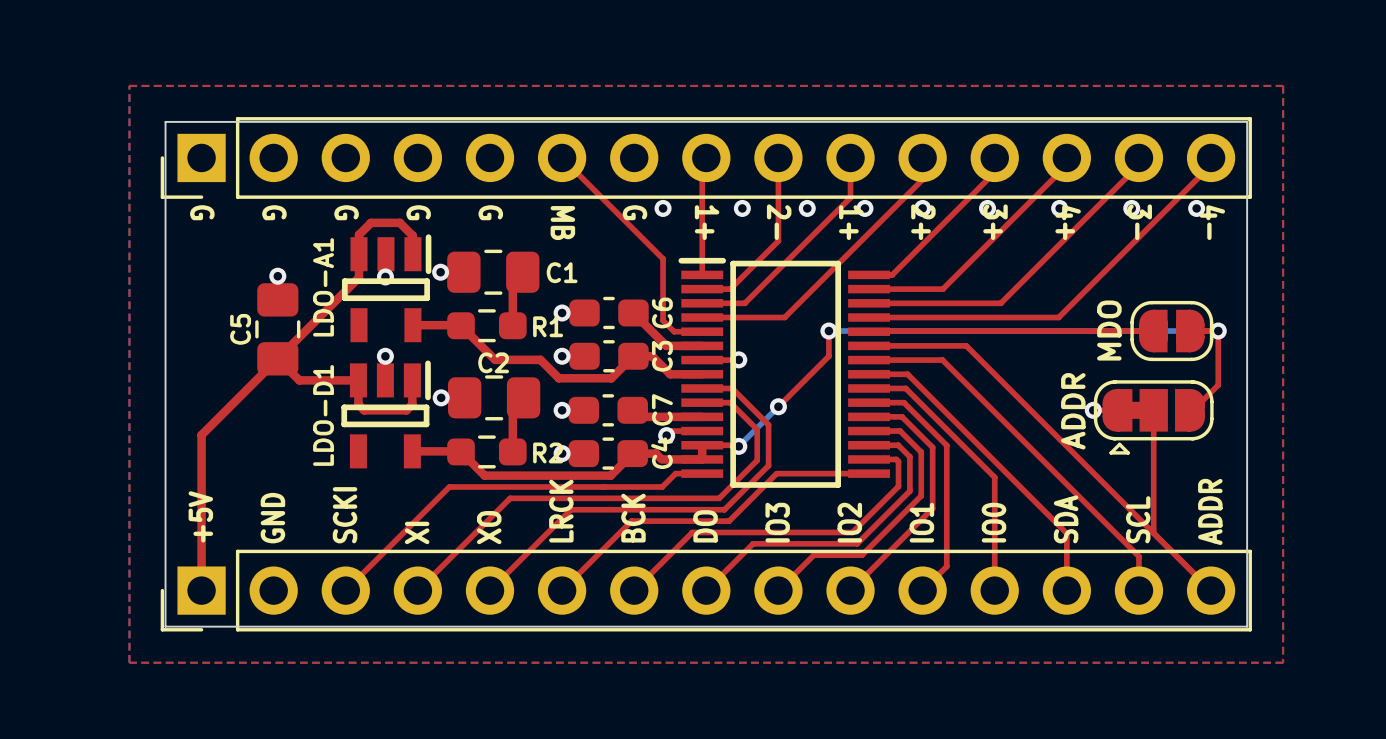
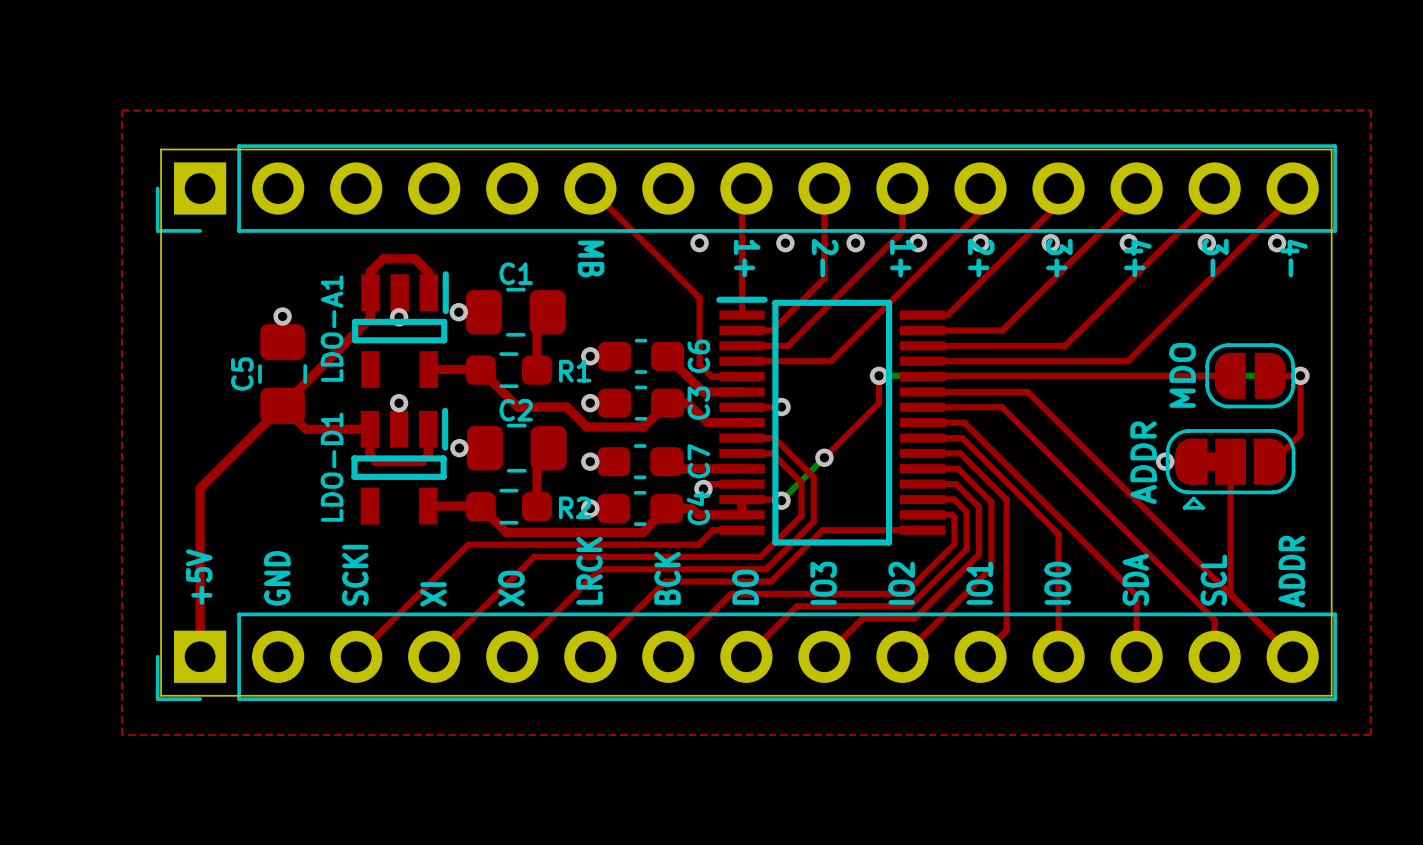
text: G (202, 212) -> none
text: G (274, 212) -> none
text: G (346, 212) -> none
text: G (418, 212) -> none
text: G (490, 212) -> none
text: G (634, 212) -> none
C1 name position: C1 (562, 272) -> C1 (516, 273)

